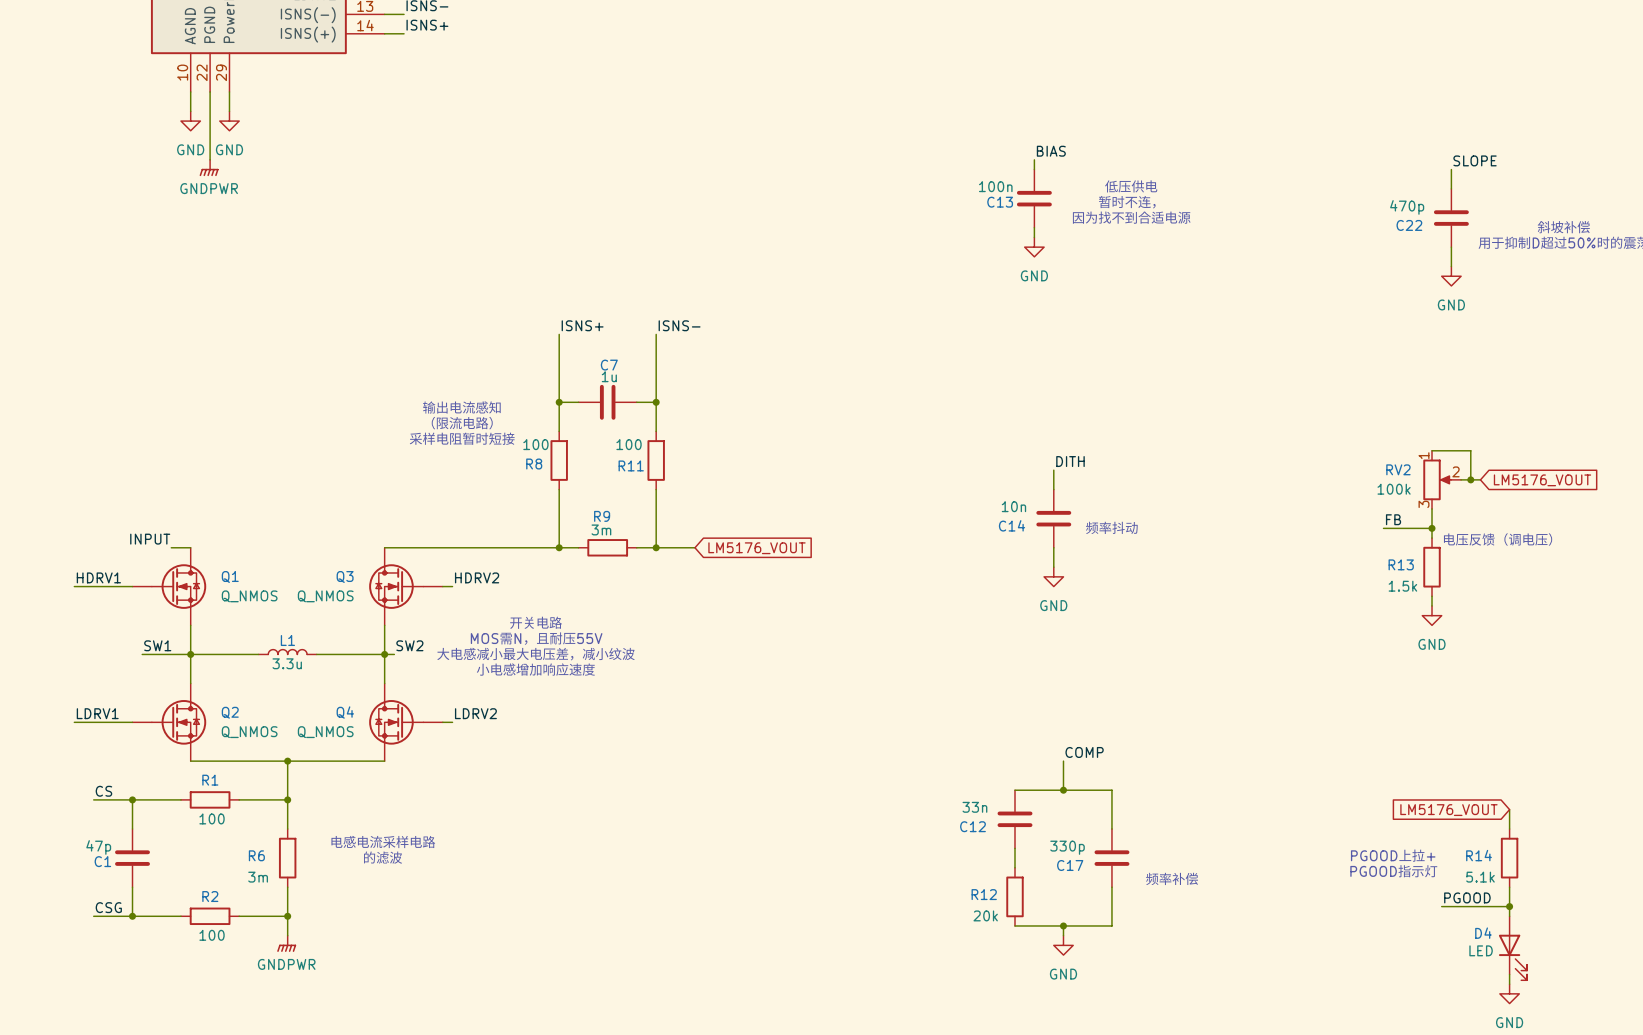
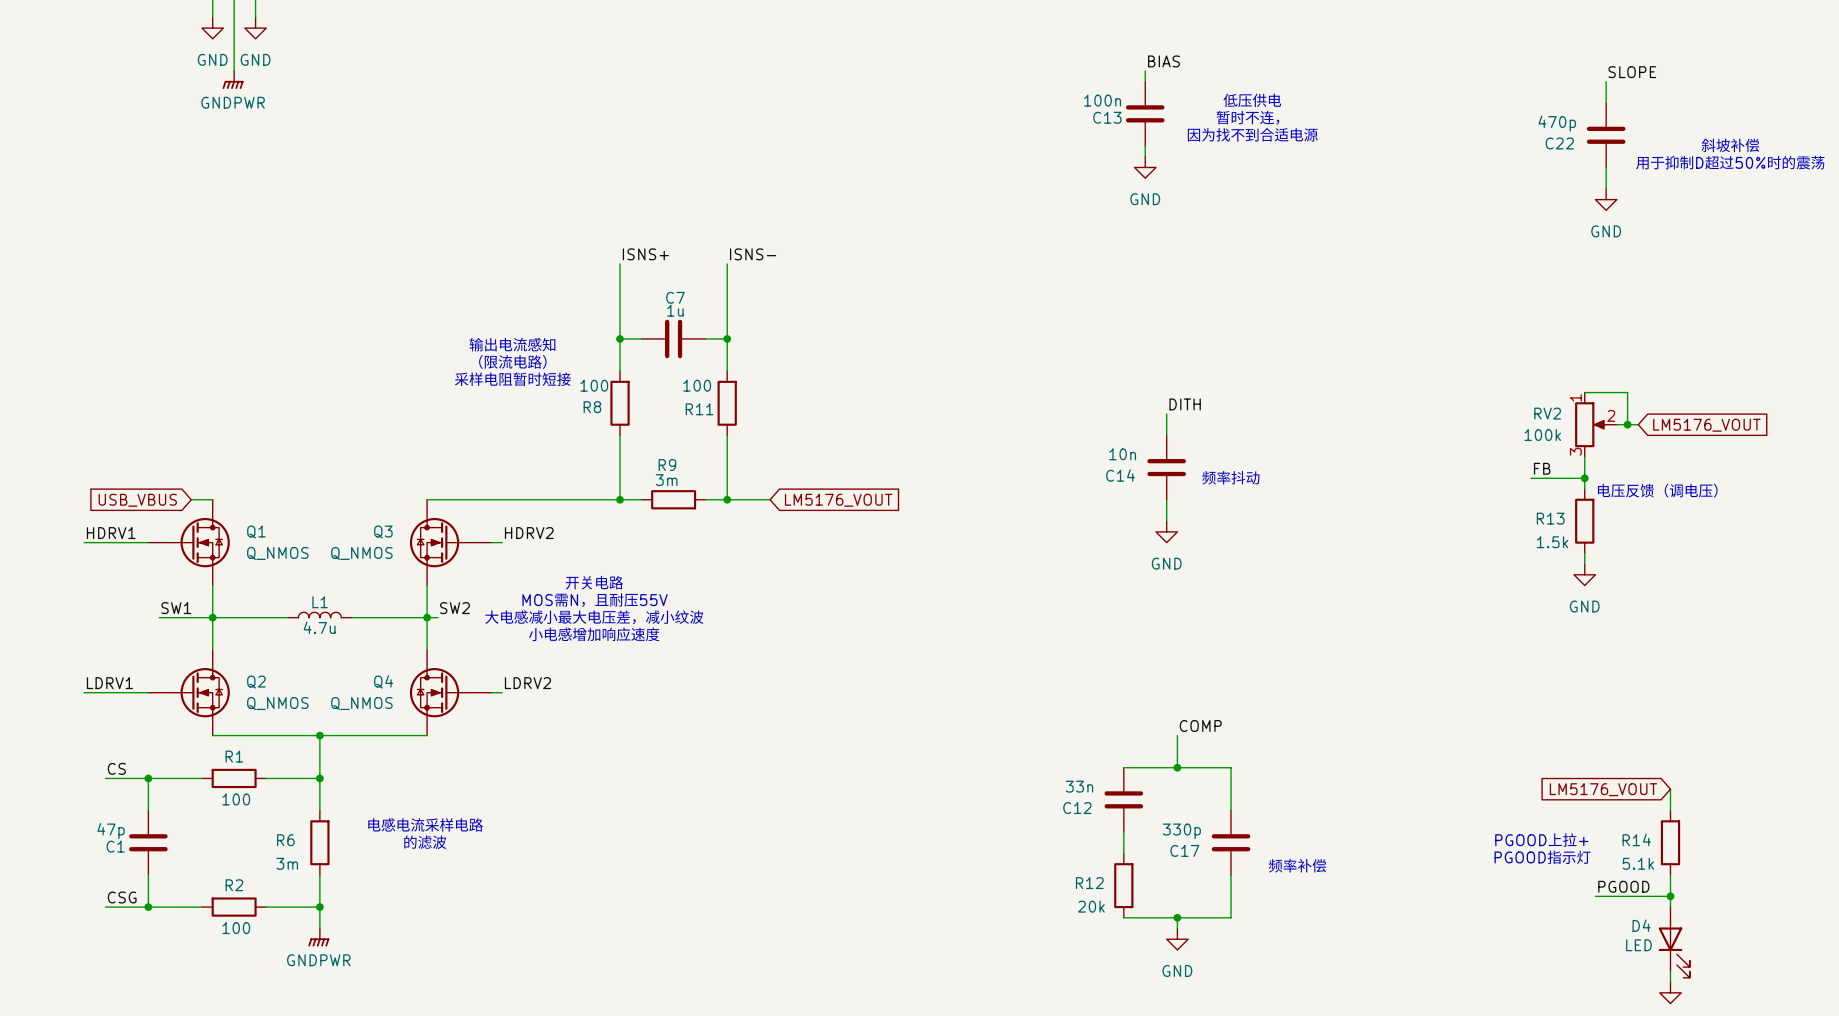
label: INPUT (150, 539) -> none
global label: none -> USB_VBUS (137, 500)
L1 value: 3.3u (287, 663) -> 4.7u (319, 627)

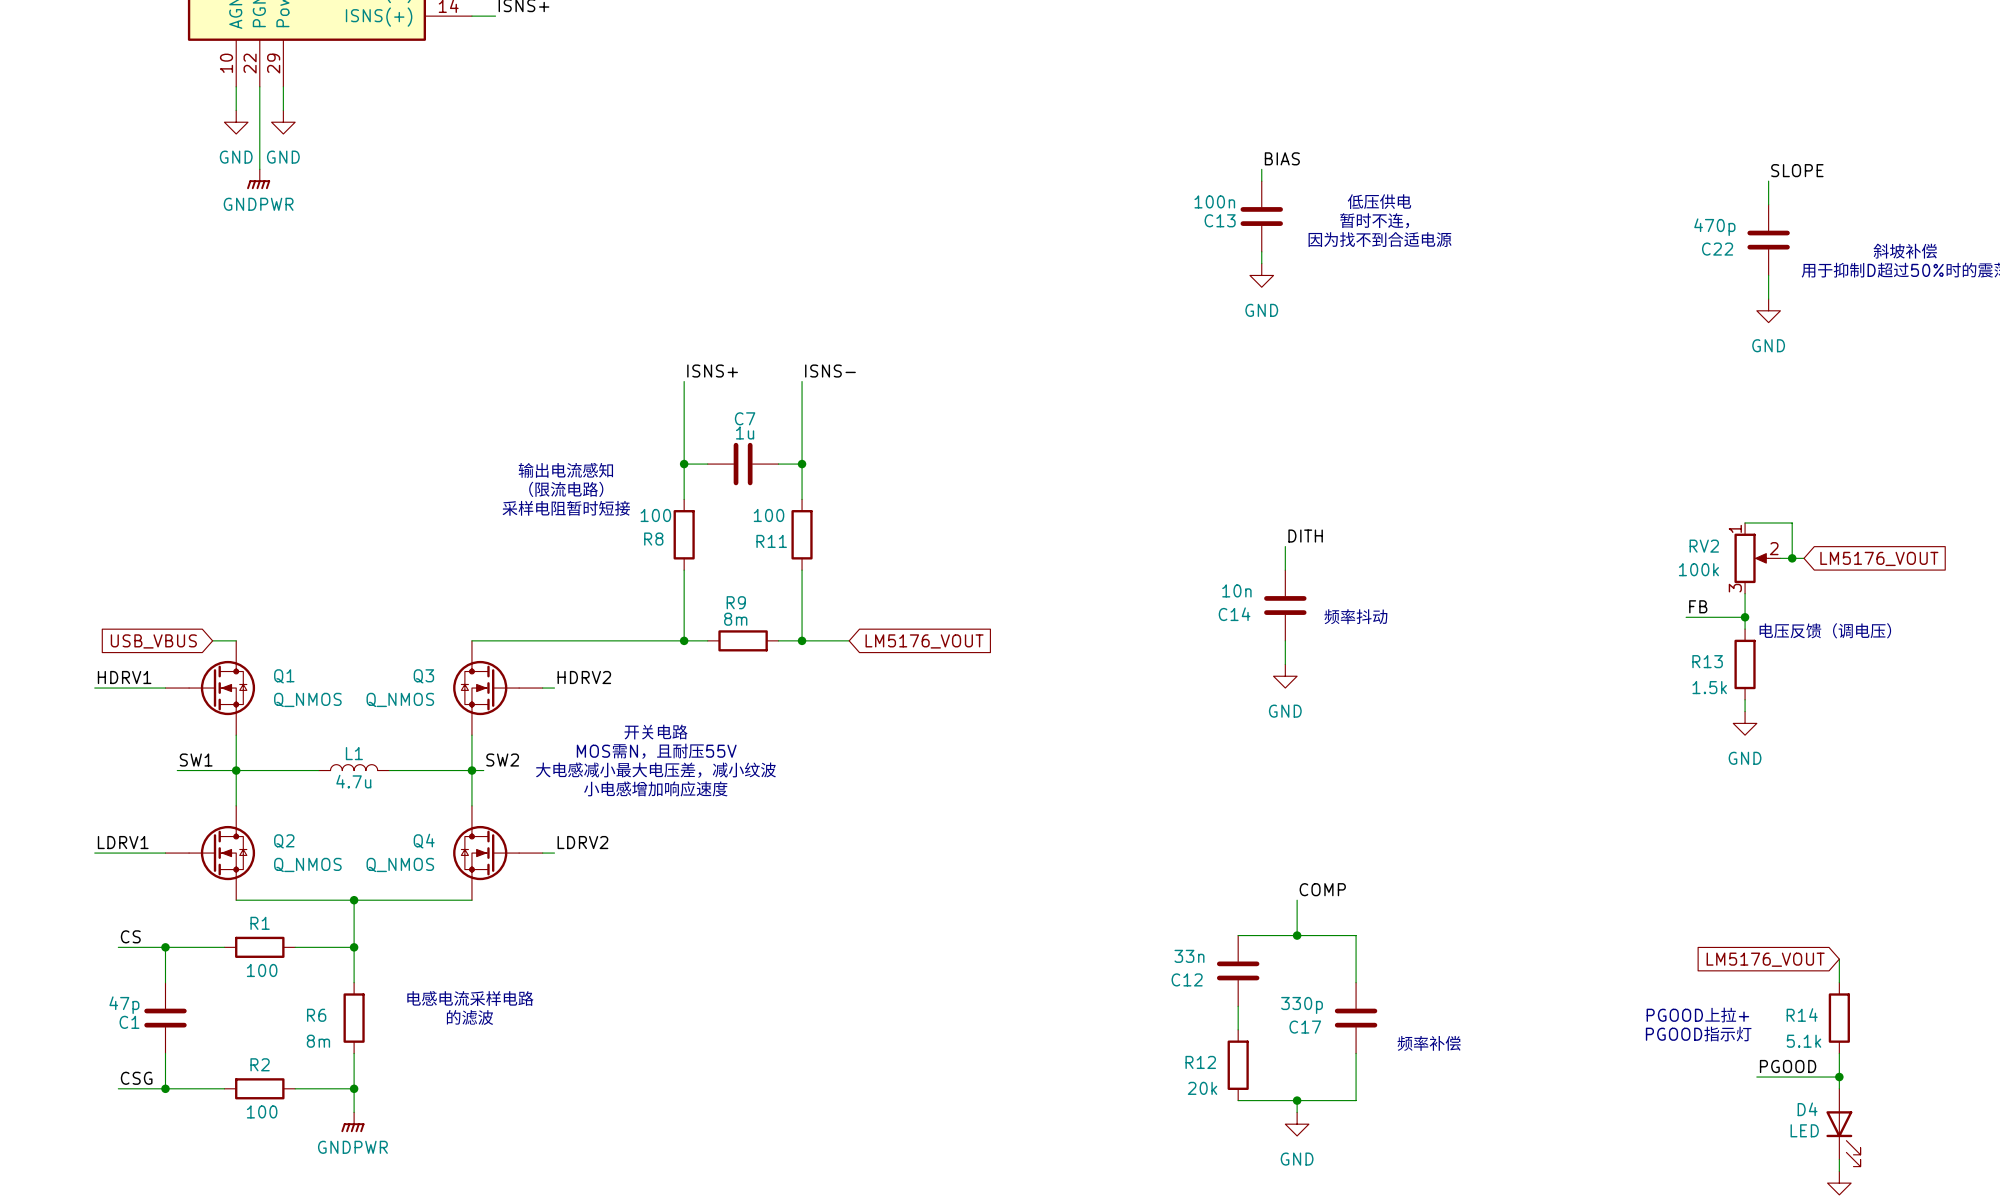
R9 value: 3m (666, 480) -> 8m (735, 619)
R6 value: 3m (287, 863) -> 8m (318, 1041)

